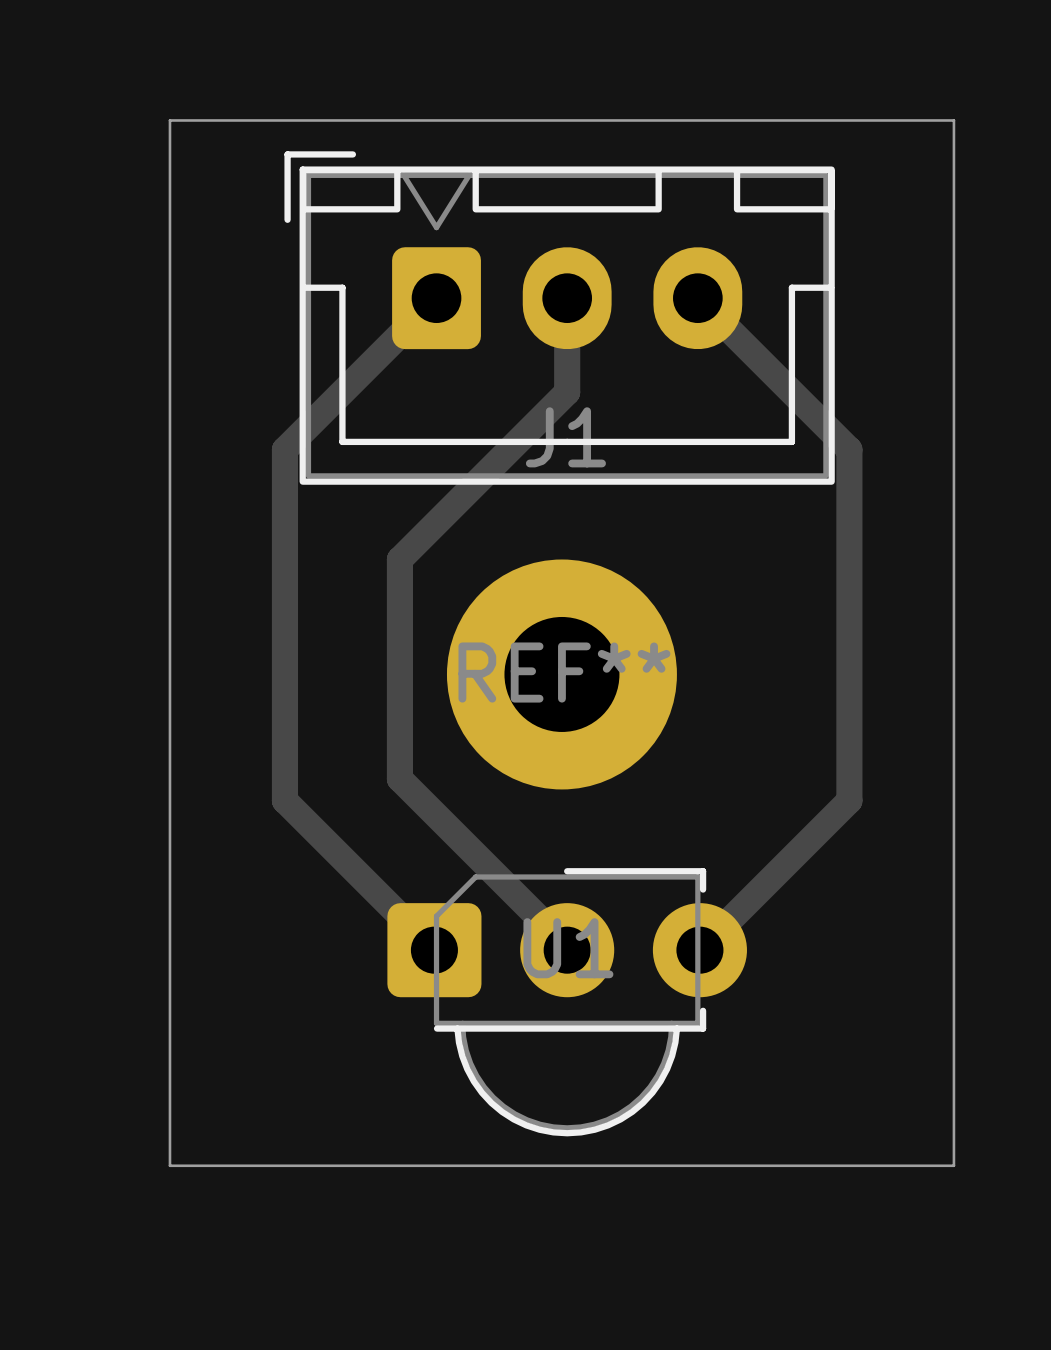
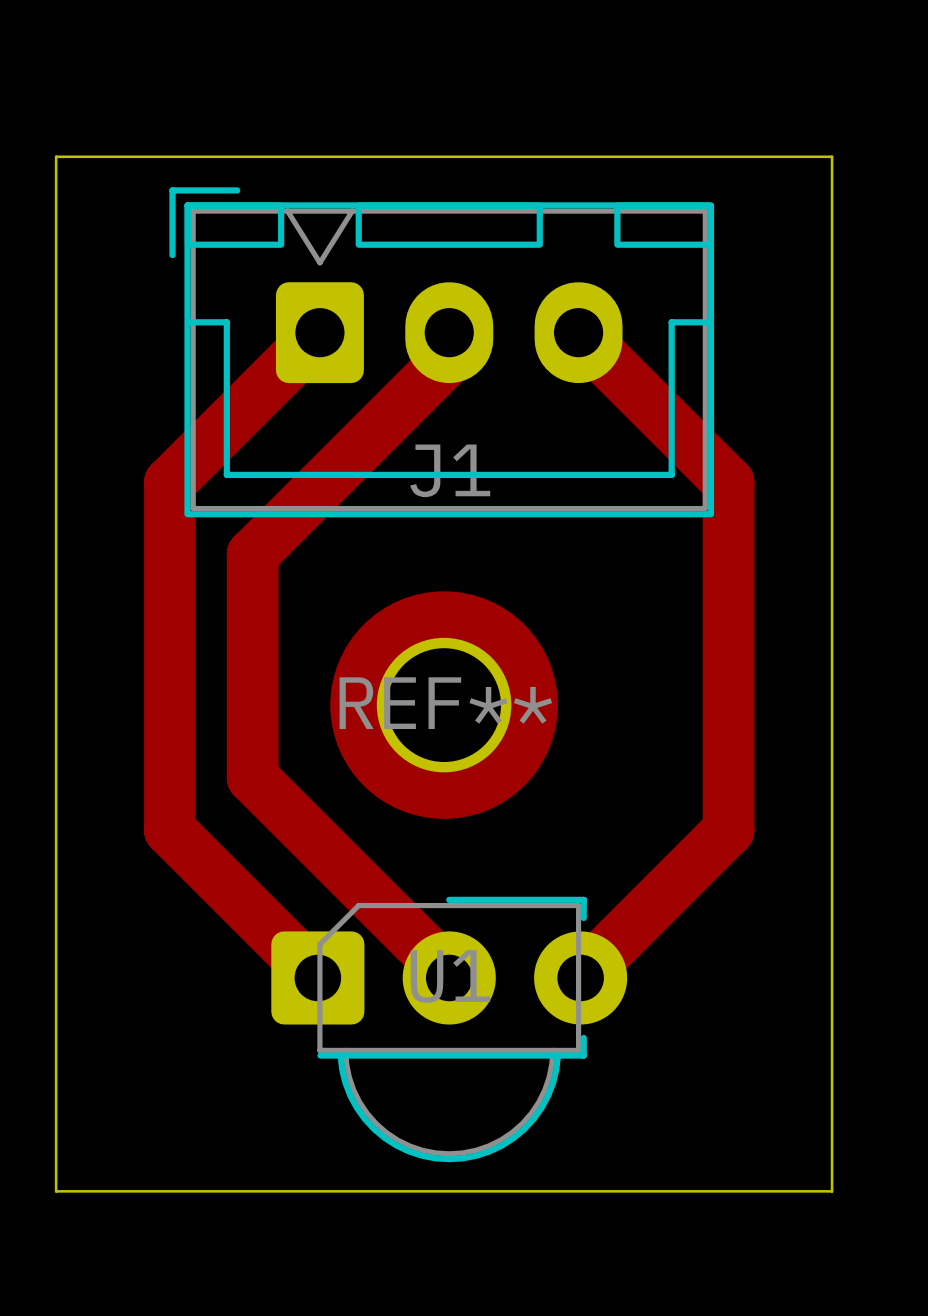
track width: thin (436, 298) (284, 449) (284, 800) (434, 950) -> thick (319, 332) (169, 482) (169, 830) (317, 977)
track width: thin (697, 298) (849, 449) (849, 800) (699, 950) -> thick (578, 332) (728, 482) (728, 830) (580, 977)
track: (567, 323) (567, 392) (399, 559) (399, 779) -> (449, 358) (252, 554) (252, 777) (283, 808)
track width: thin (399, 779) (567, 946) -> thick (283, 808) (449, 974)

